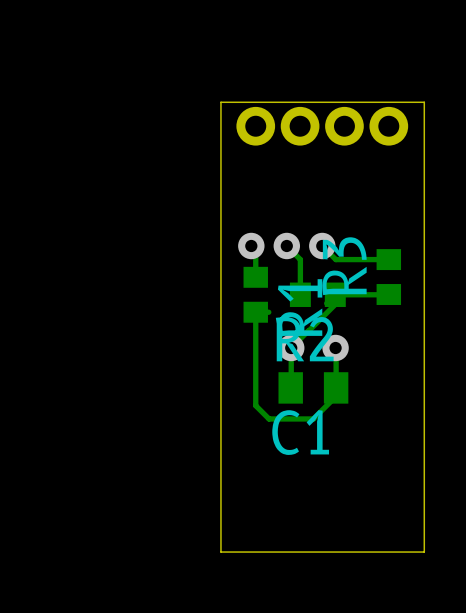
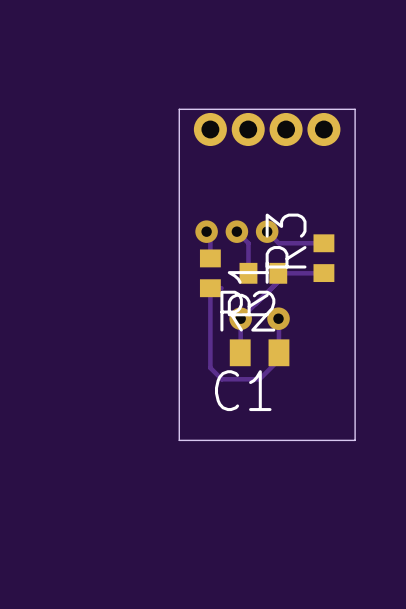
board edge: (424, 102) (424, 552) (220, 552) (220, 102) (424, 102) -> (355, 109) (355, 440) (179, 440) (179, 109) (355, 109)

